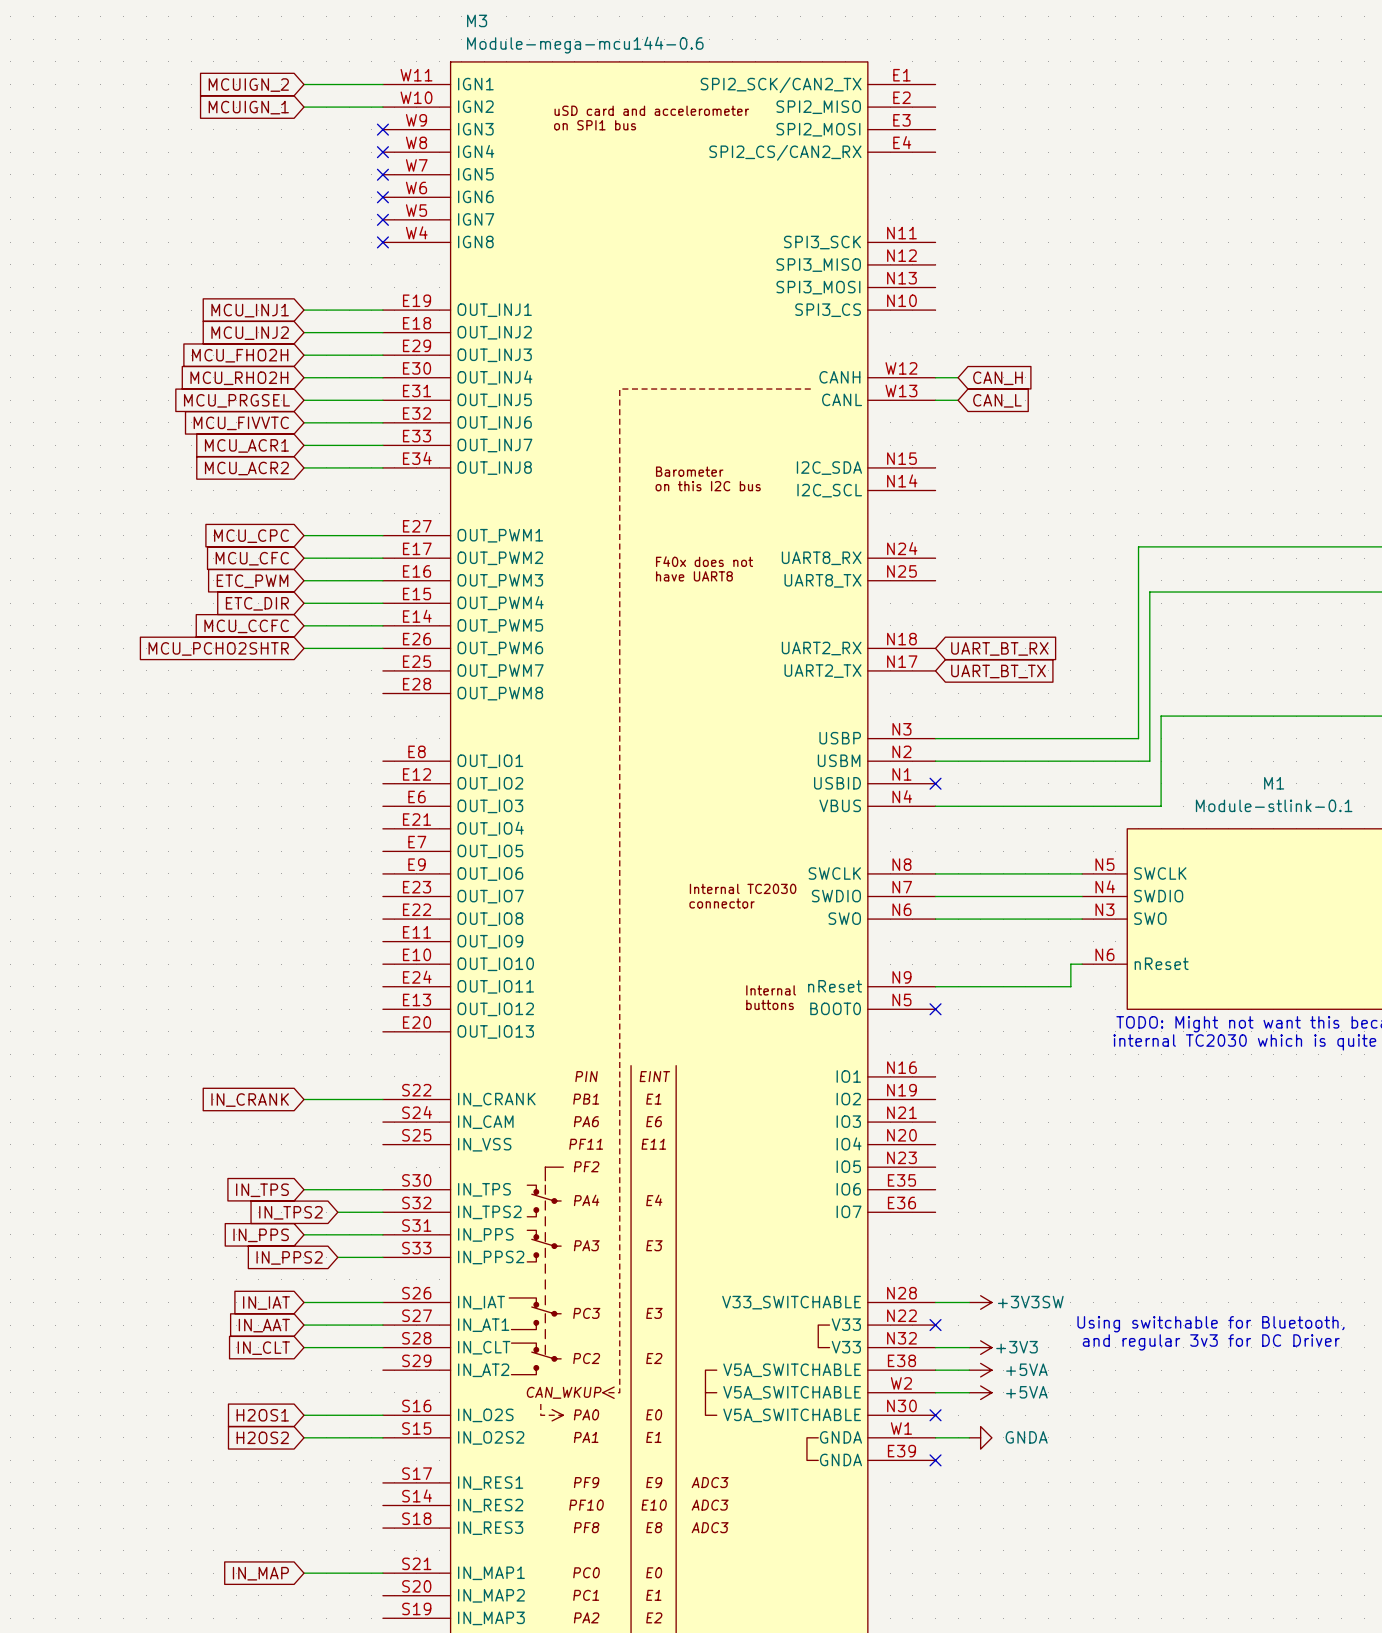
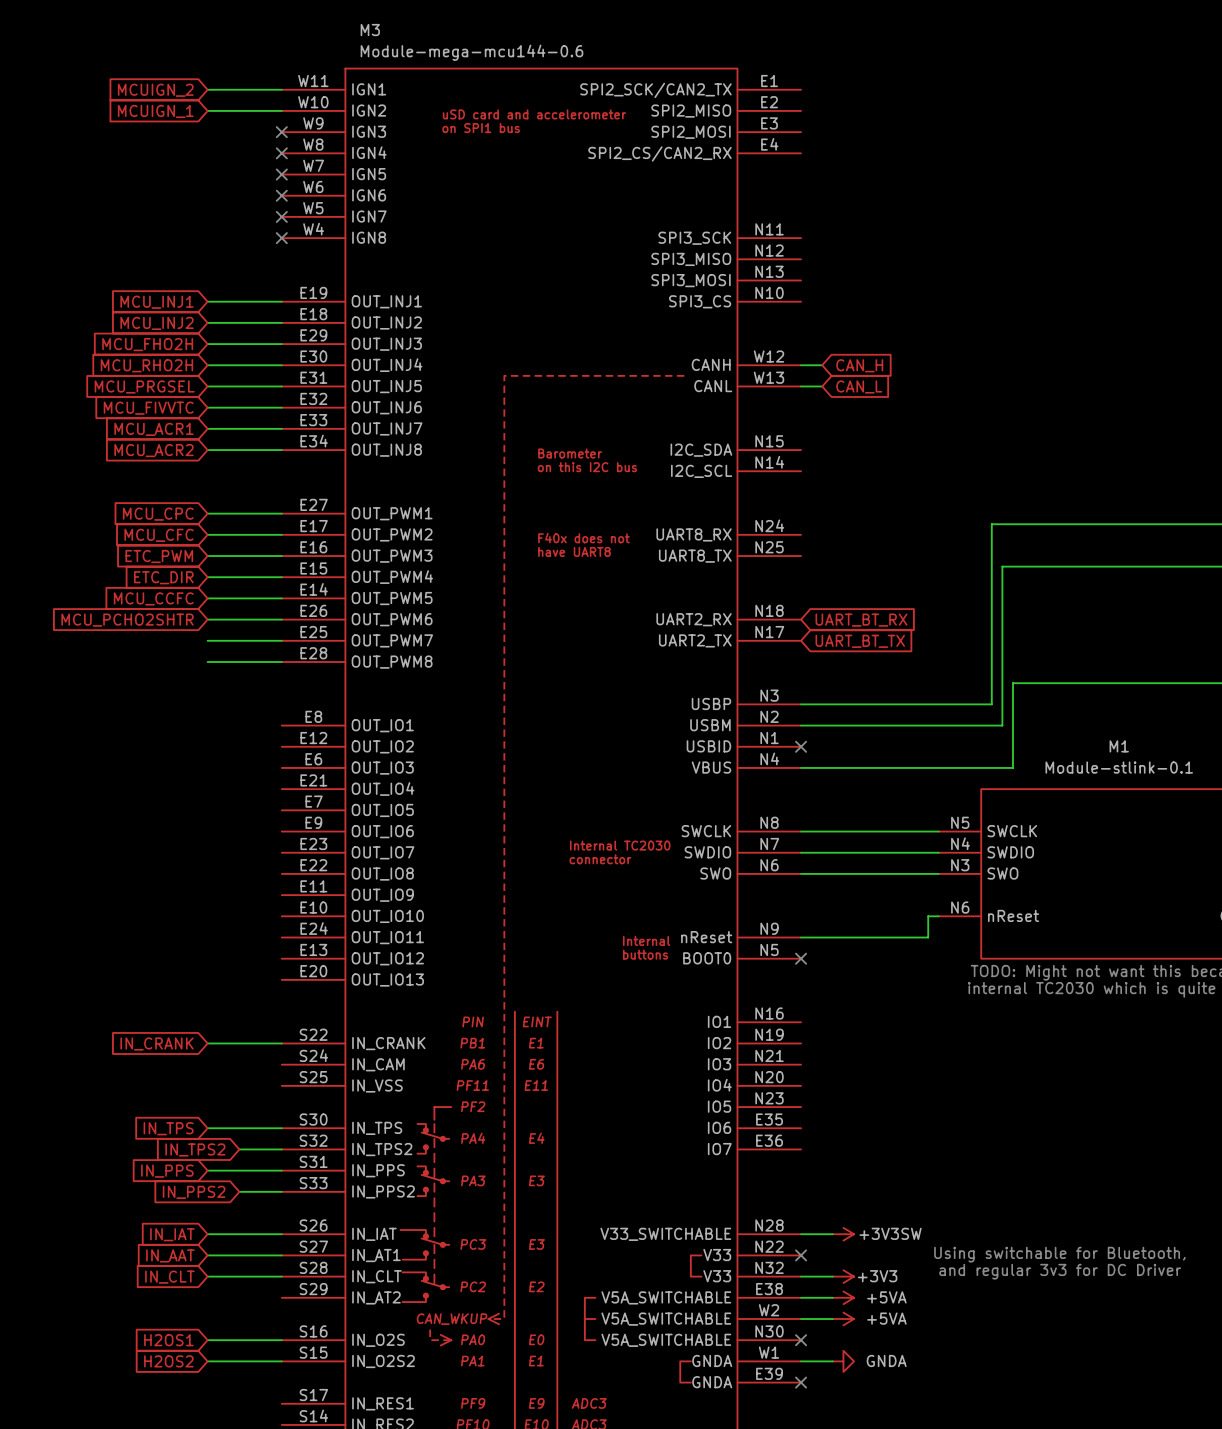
wire: none -> (207, 640) (281, 640)
wire: none -> (207, 661) (281, 661)

